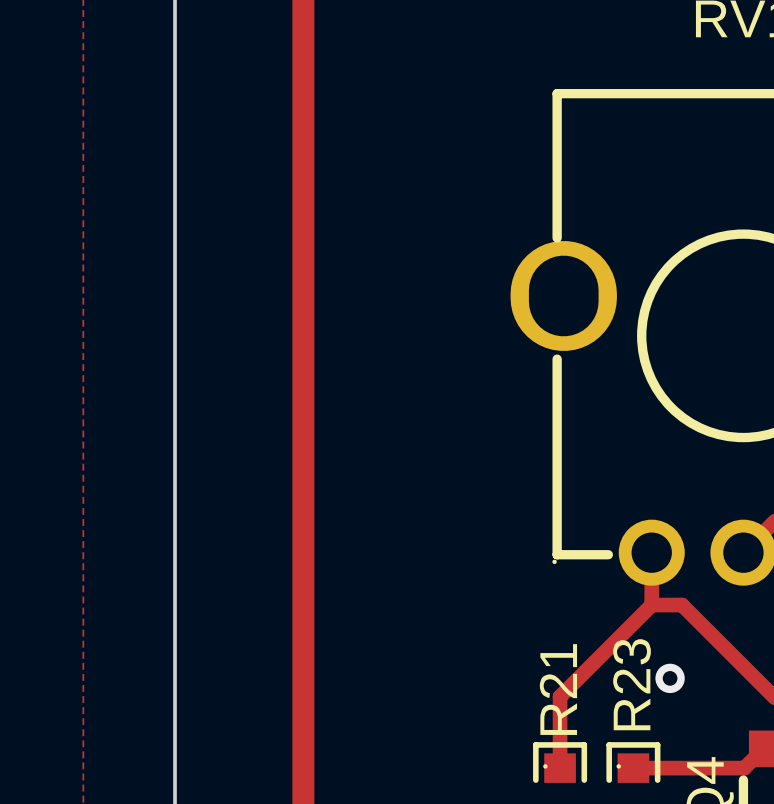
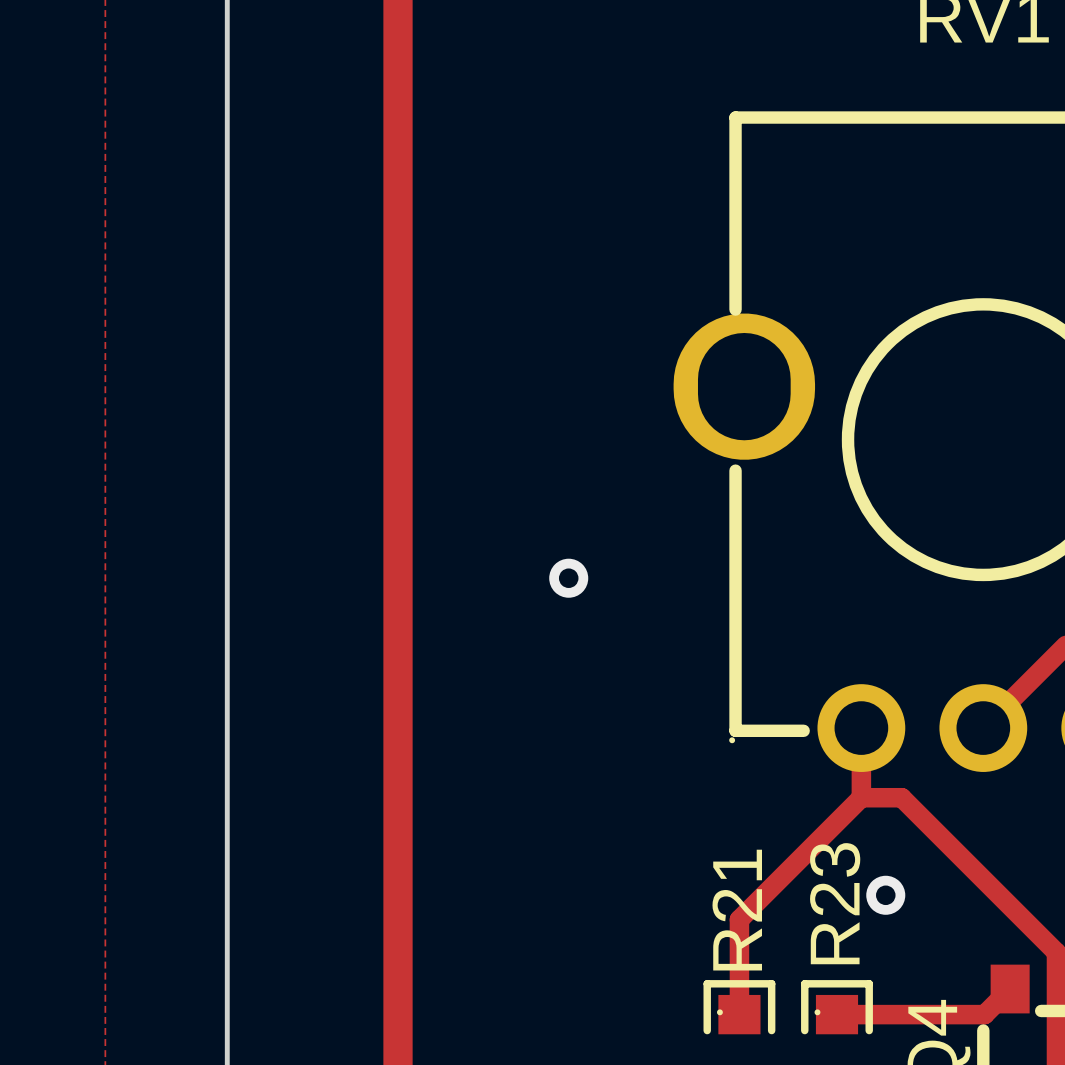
via: none -> (568, 578)

